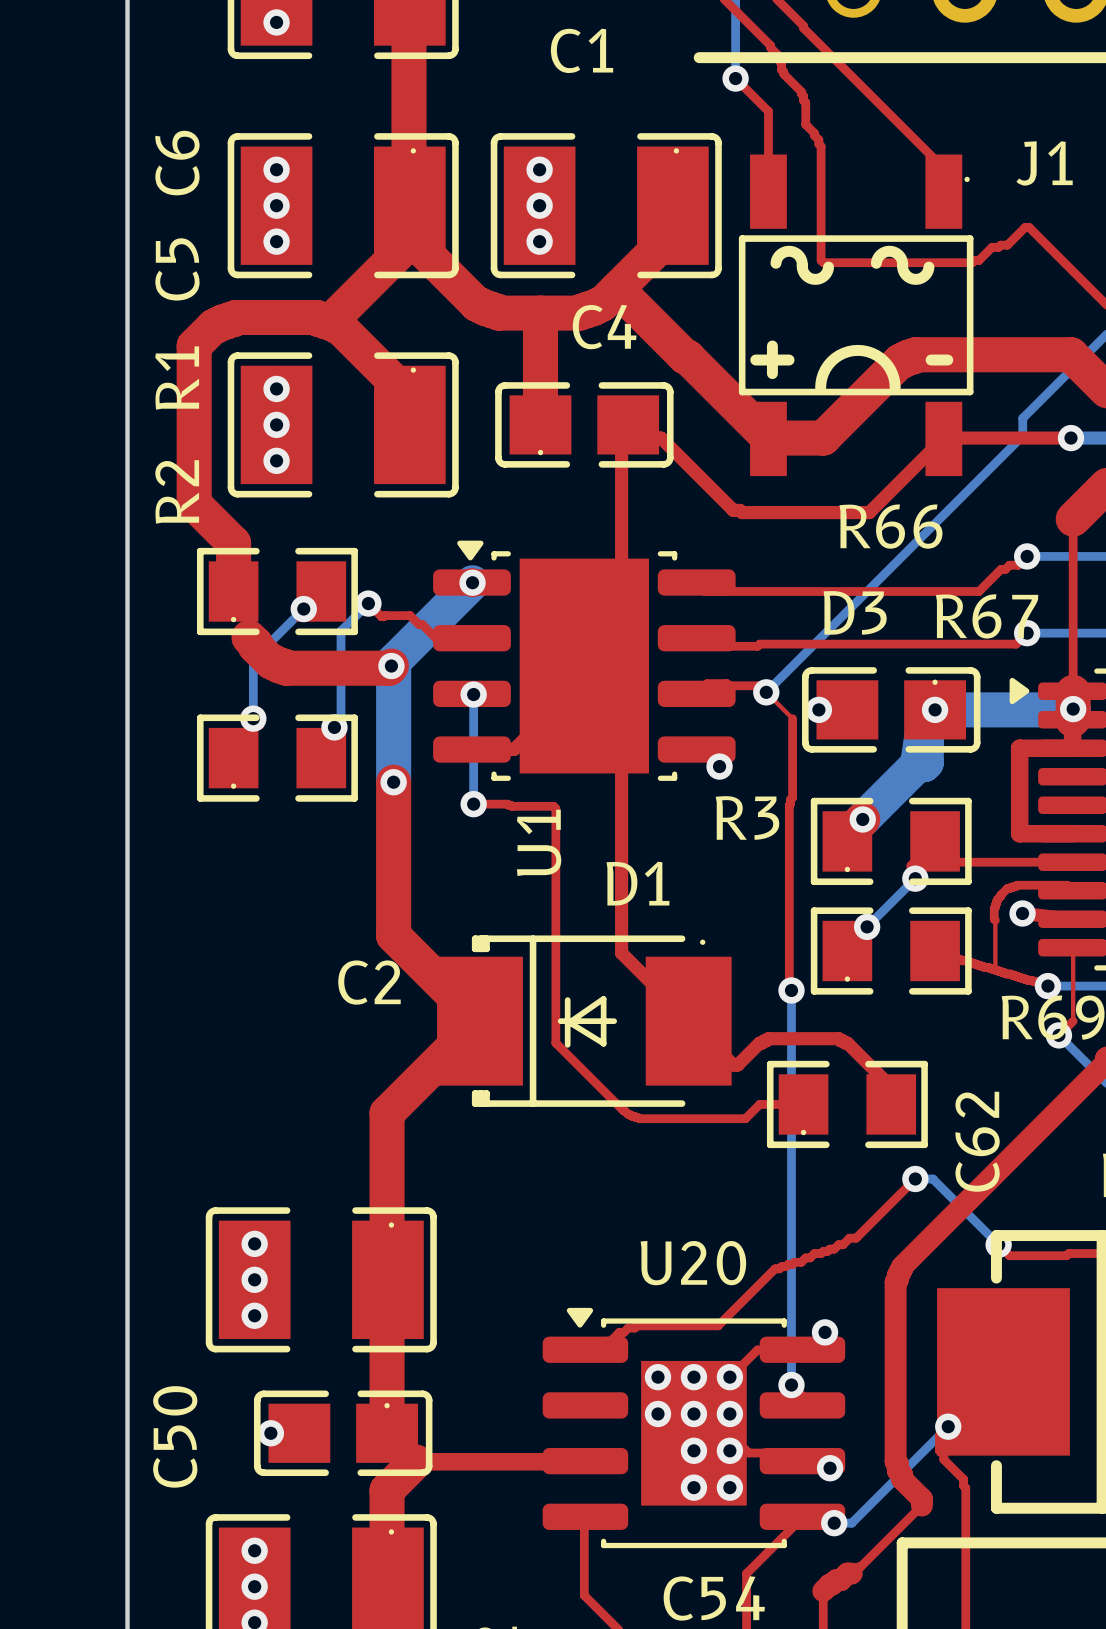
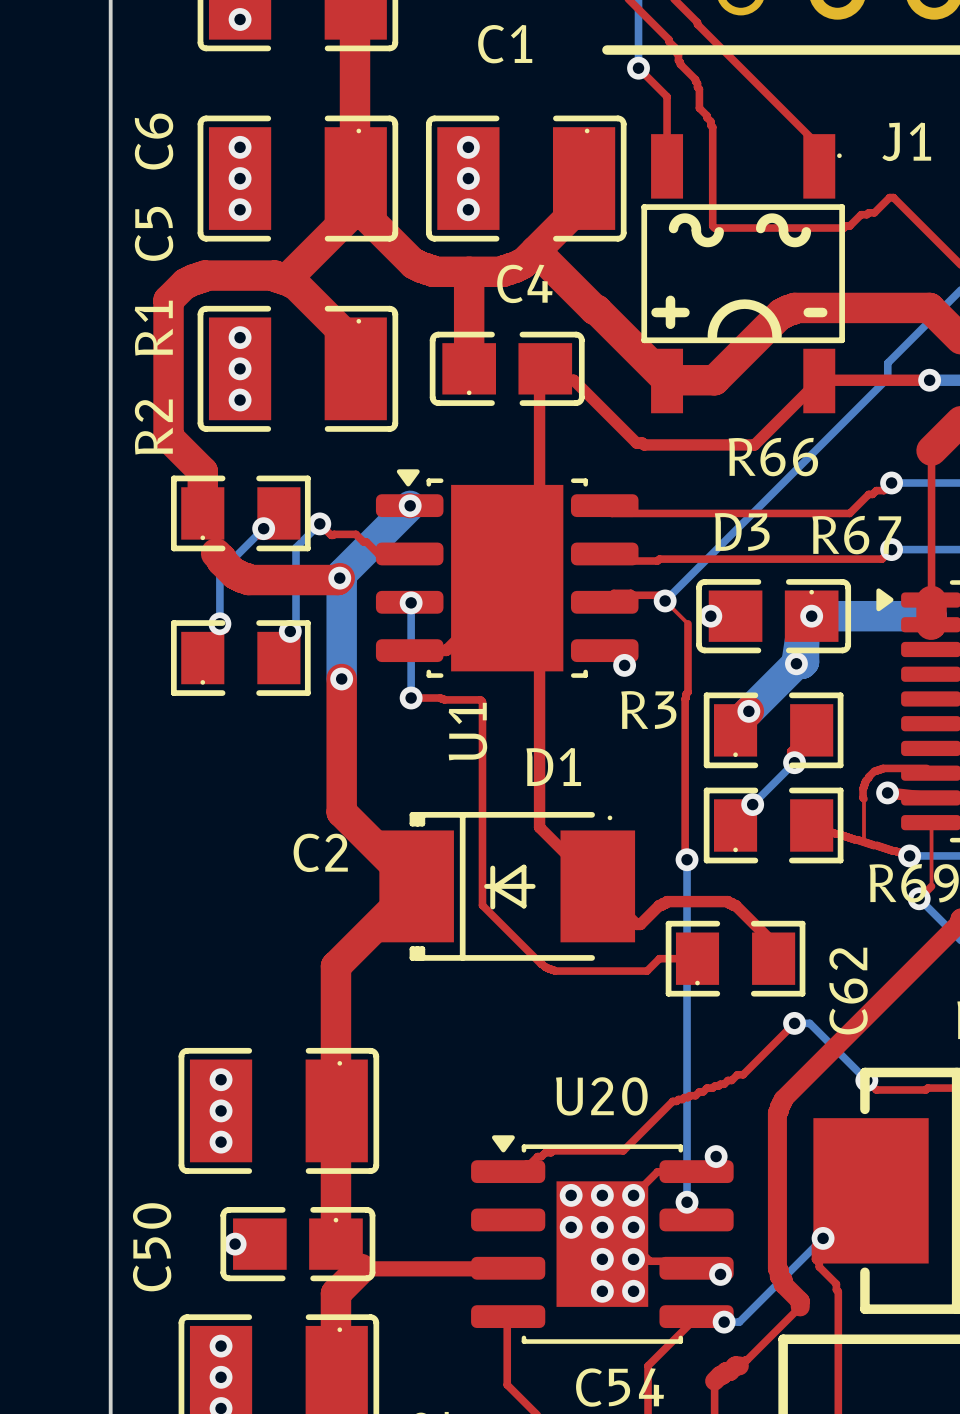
via position: (1073, 709) -> (796, 663)
top track: (1072, 719) (1072, 748) (1019, 748) (1019, 833) (1072, 833) -> none
top track: (935, 841) (957, 862) (1072, 862) -> none

